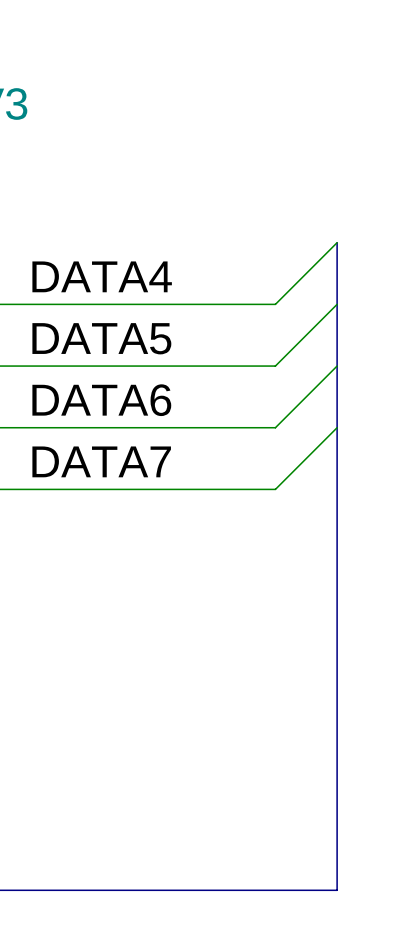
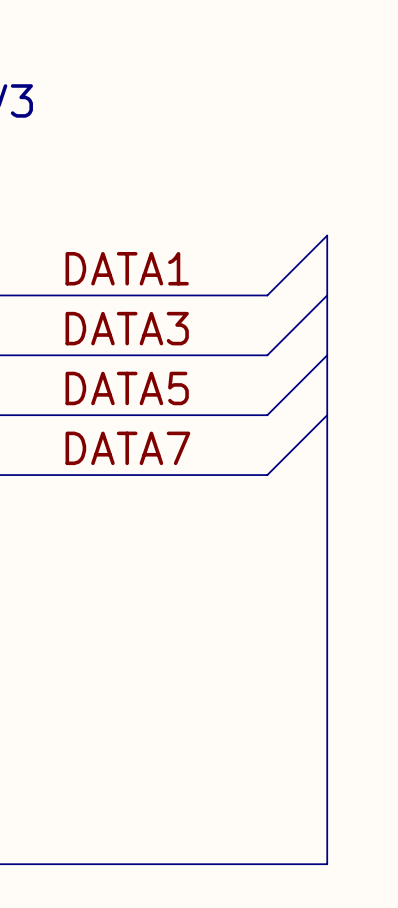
label: DATA4 (102, 276) -> DATA1 (127, 268)
label position: DATA5 (101, 338) -> DATA5 (127, 388)
label: none -> DATA3 (127, 328)
label: DATA6 (101, 400) -> none
label position: DATA7 (101, 461) -> DATA7 (127, 448)

